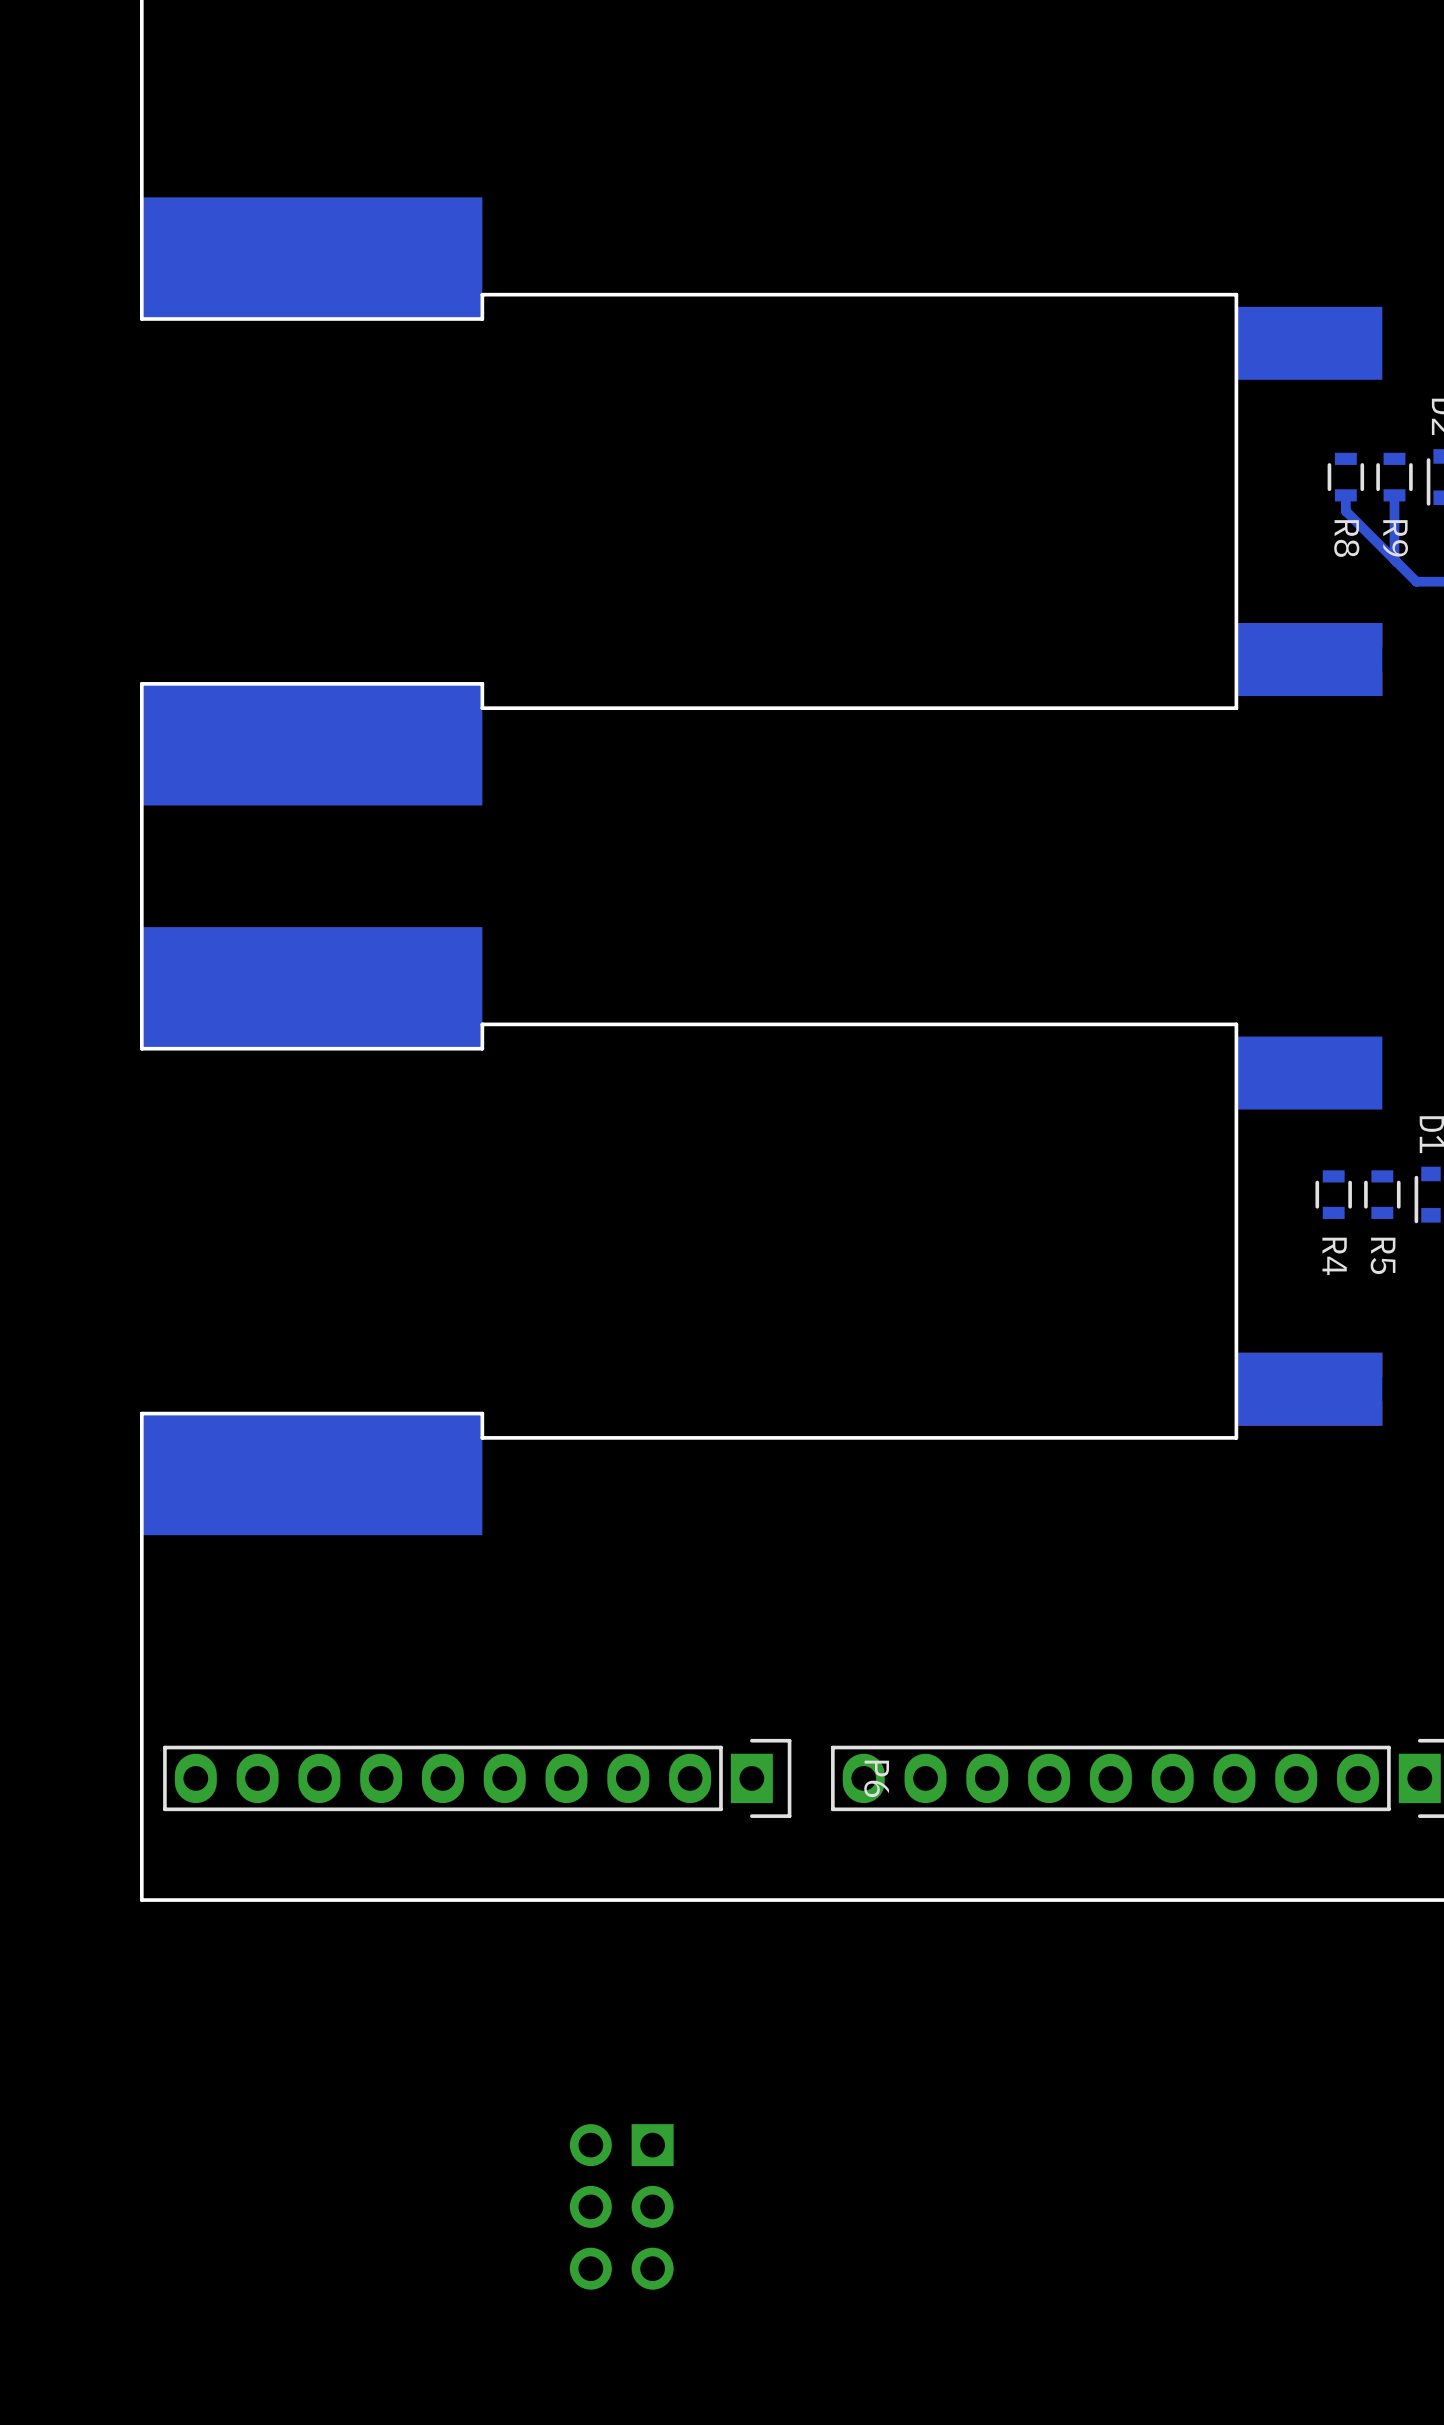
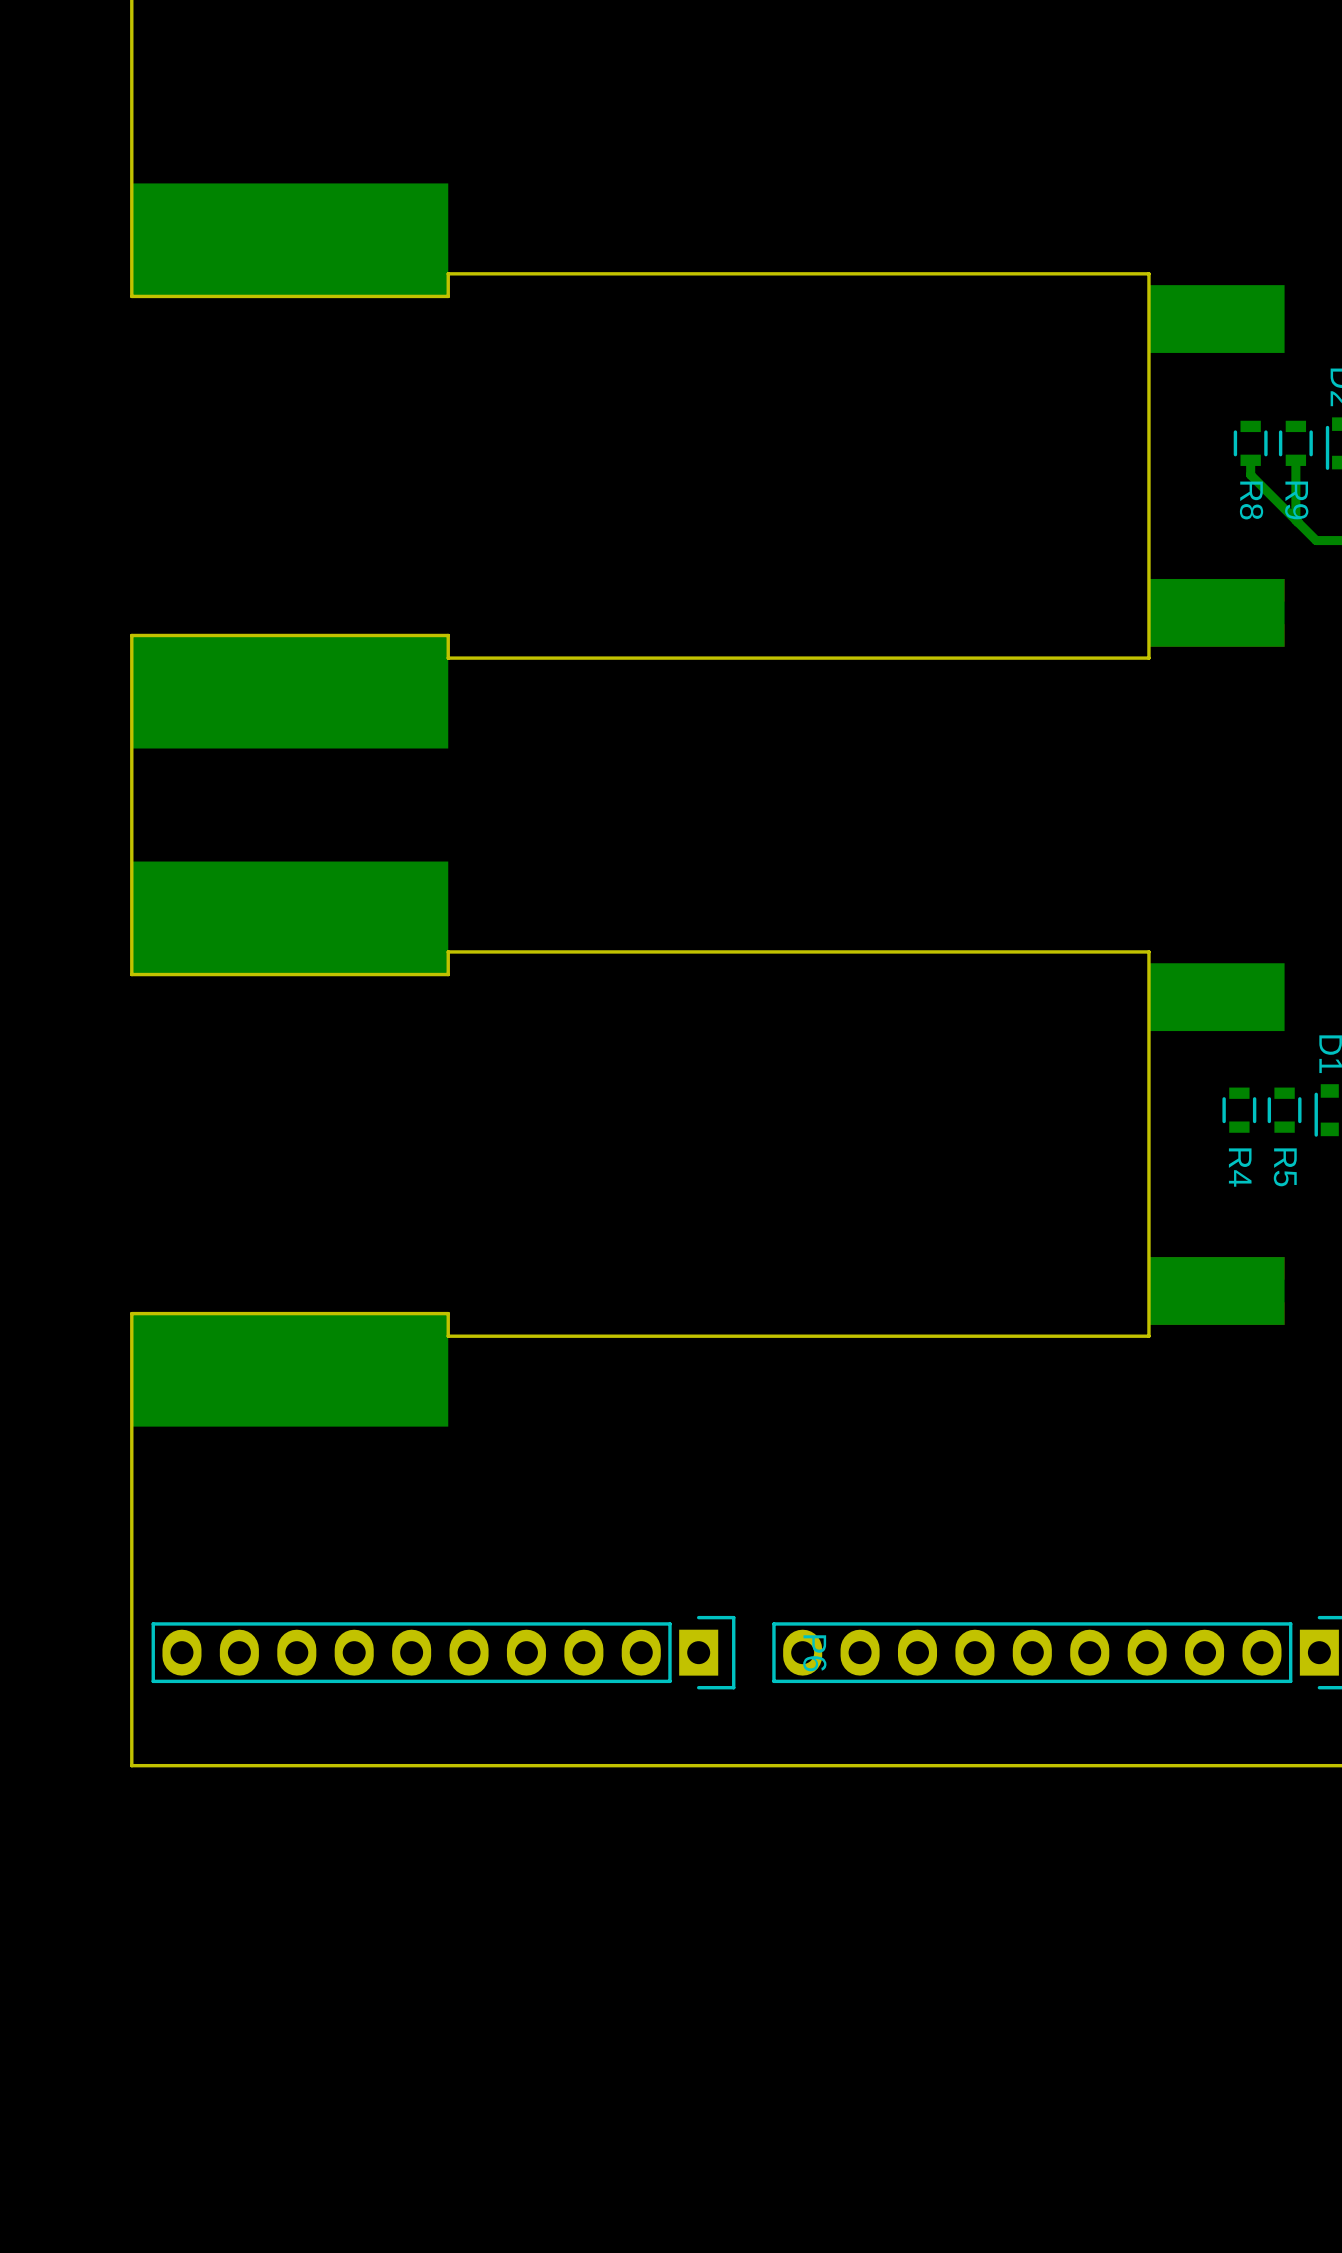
part: (621, 2206) -> none

